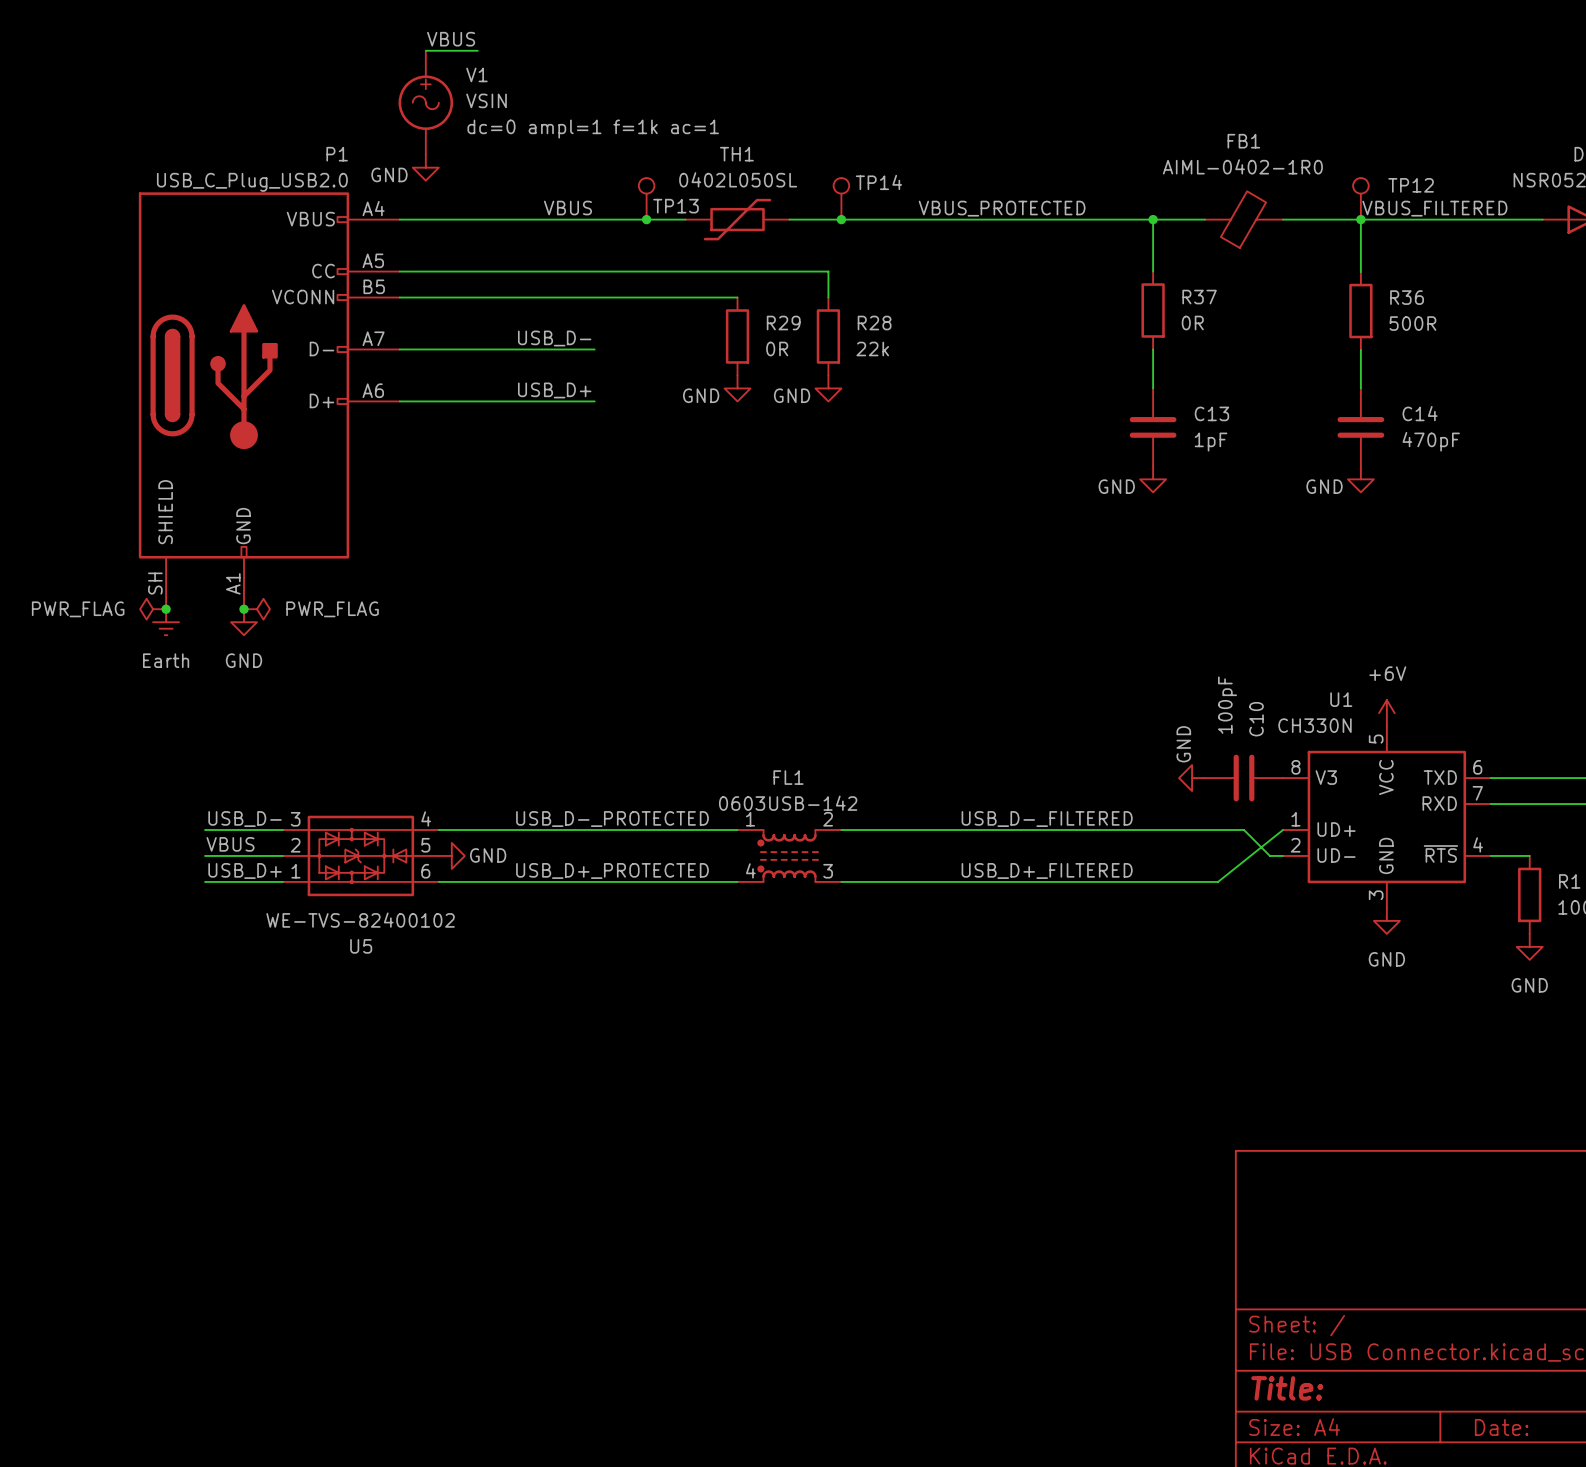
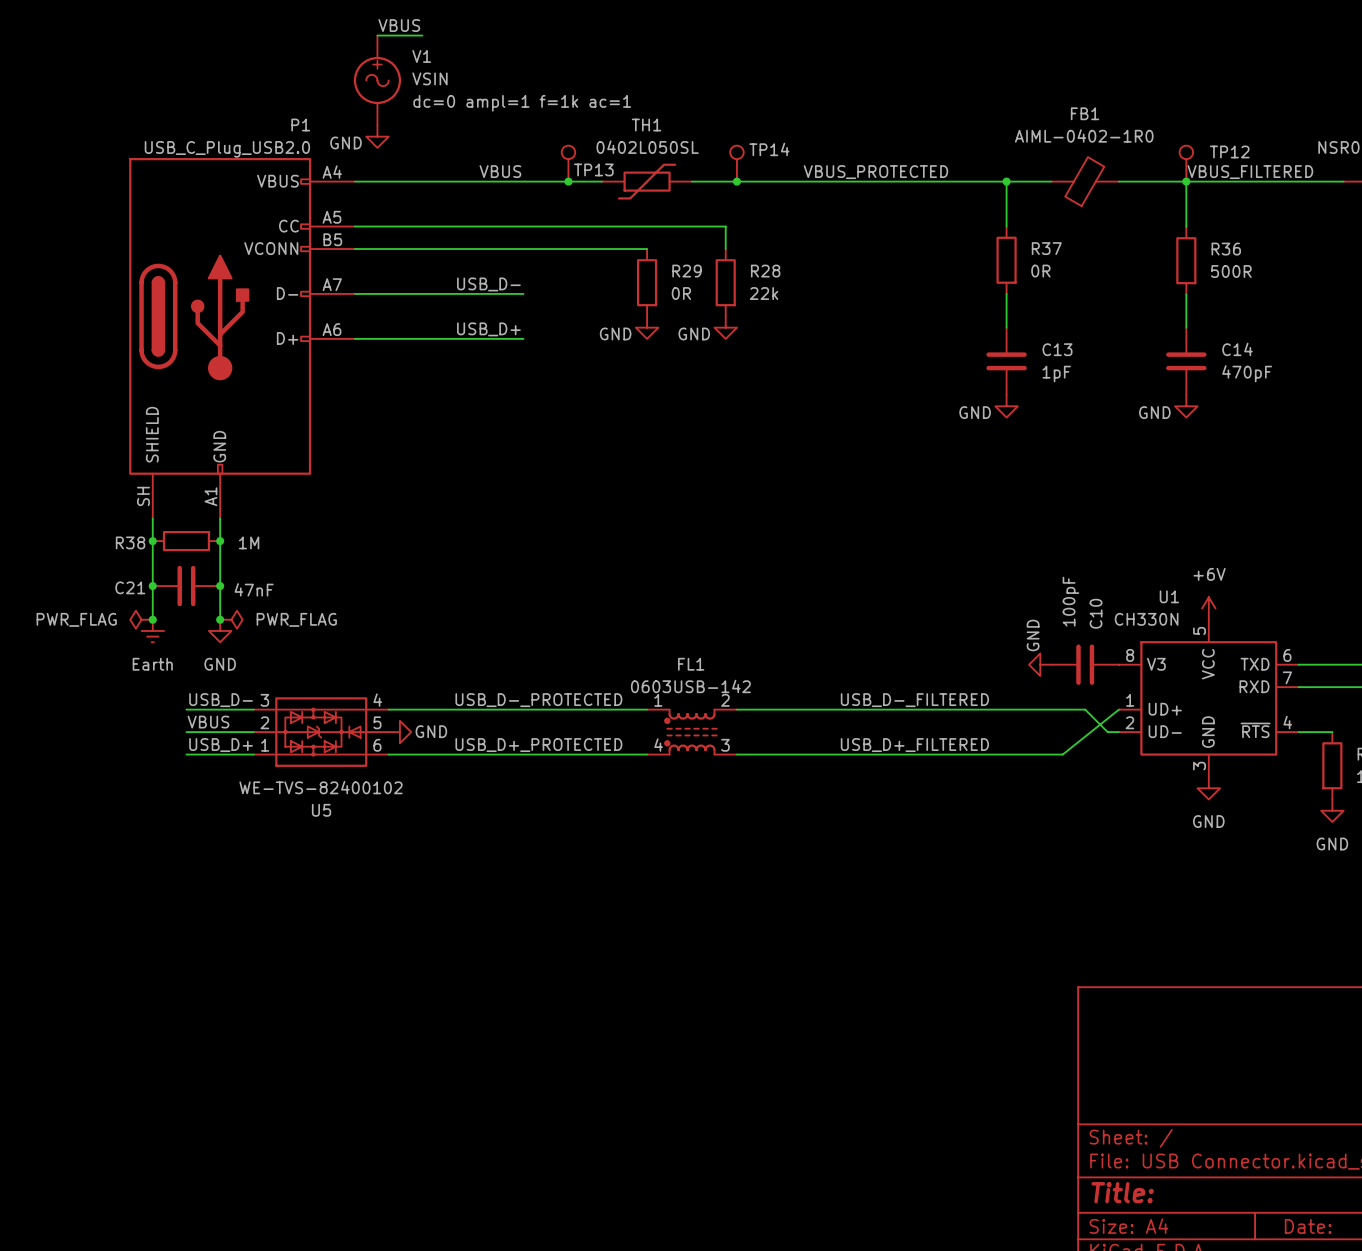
power symbol: PWR_FLAG (153, 609) -> none
wire: none -> (152, 518) (152, 619)
junction position: (166, 609) -> (152, 541)
wire: none -> (220, 518) (220, 619)
junction position: (244, 609) -> (220, 541)
power symbol: PWR_FLAG (256, 609) -> none
power symbol position: Earth (166, 622) -> Earth (152, 630)
power symbol position: GND (244, 622) -> GND (220, 630)
R38: none -> 1M (186, 541)
junction: none -> (152, 586)
C21: none -> 47nF (186, 586)
junction: none -> (220, 586)
power symbol: none -> PWR_FLAG (141, 619)
junction: none -> (152, 619)
junction: none -> (220, 619)
power symbol: none -> PWR_FLAG (231, 619)

